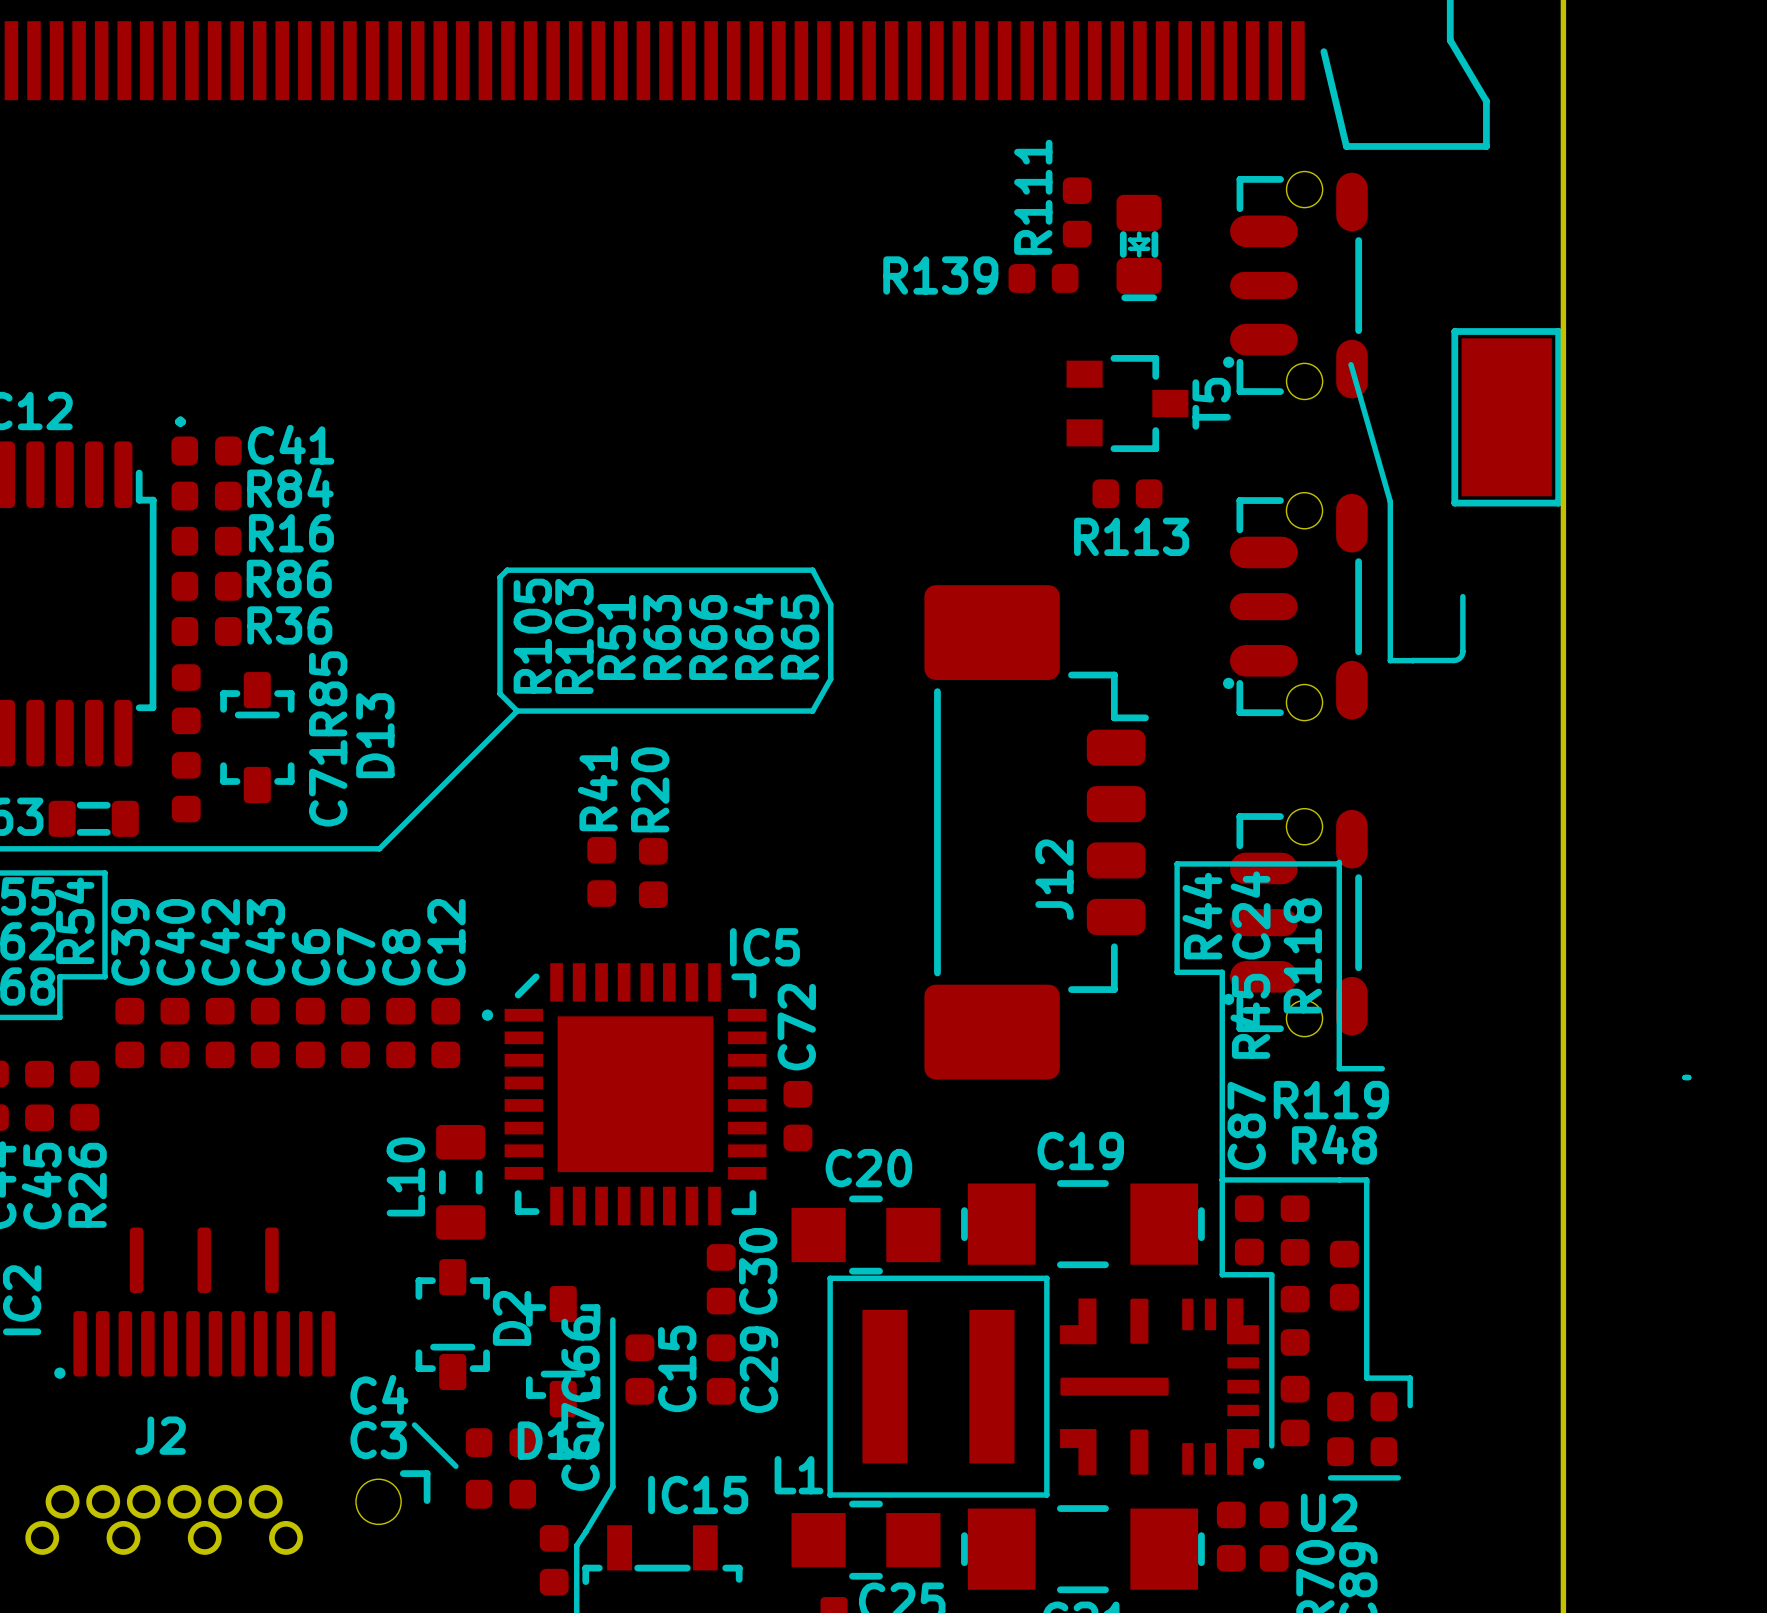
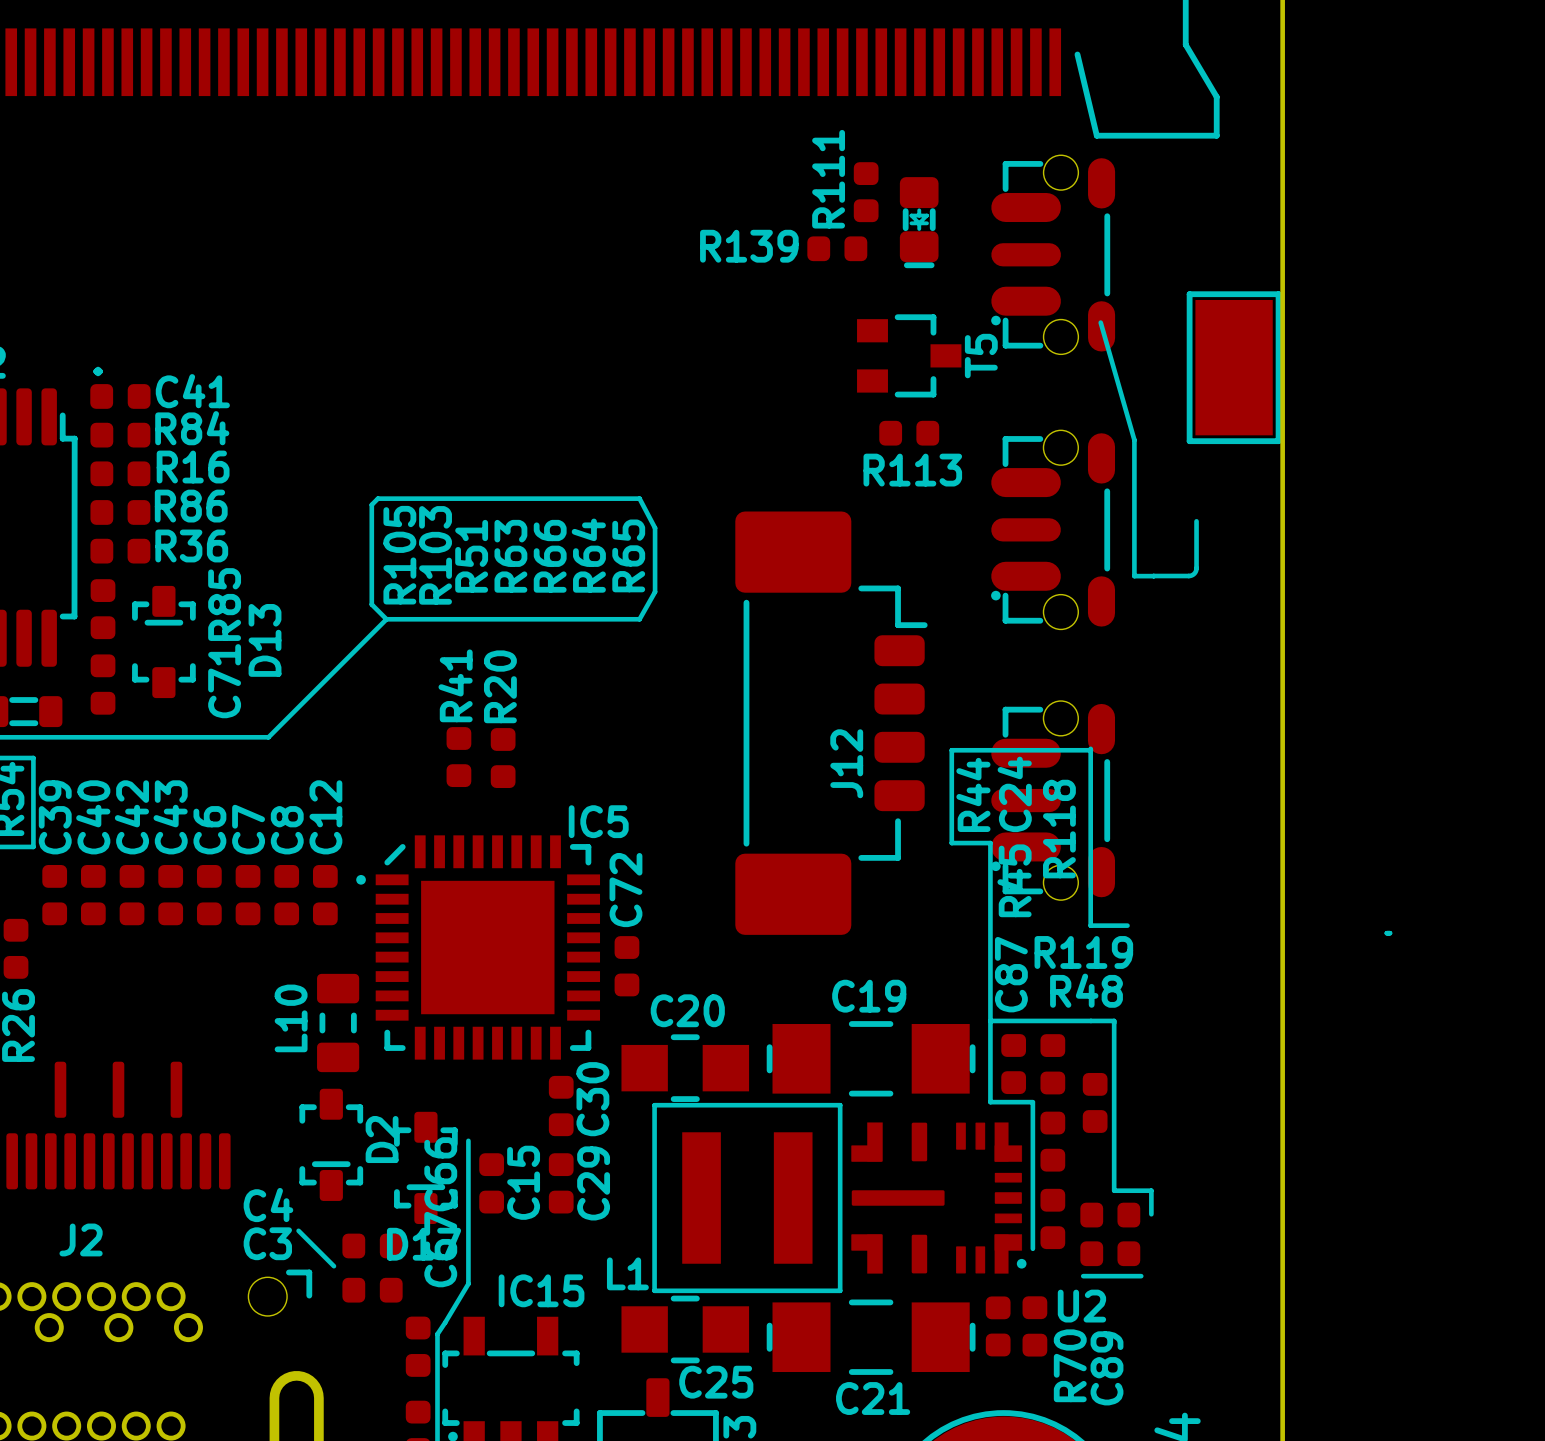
part footprint: [1223, 171, 1368, 400] -> [991, 155, 1116, 355]
part footprint: [1223, 492, 1368, 721] -> [991, 430, 1116, 630]
part footprint: [1223, 808, 1368, 1037] -> [991, 701, 1116, 901]

